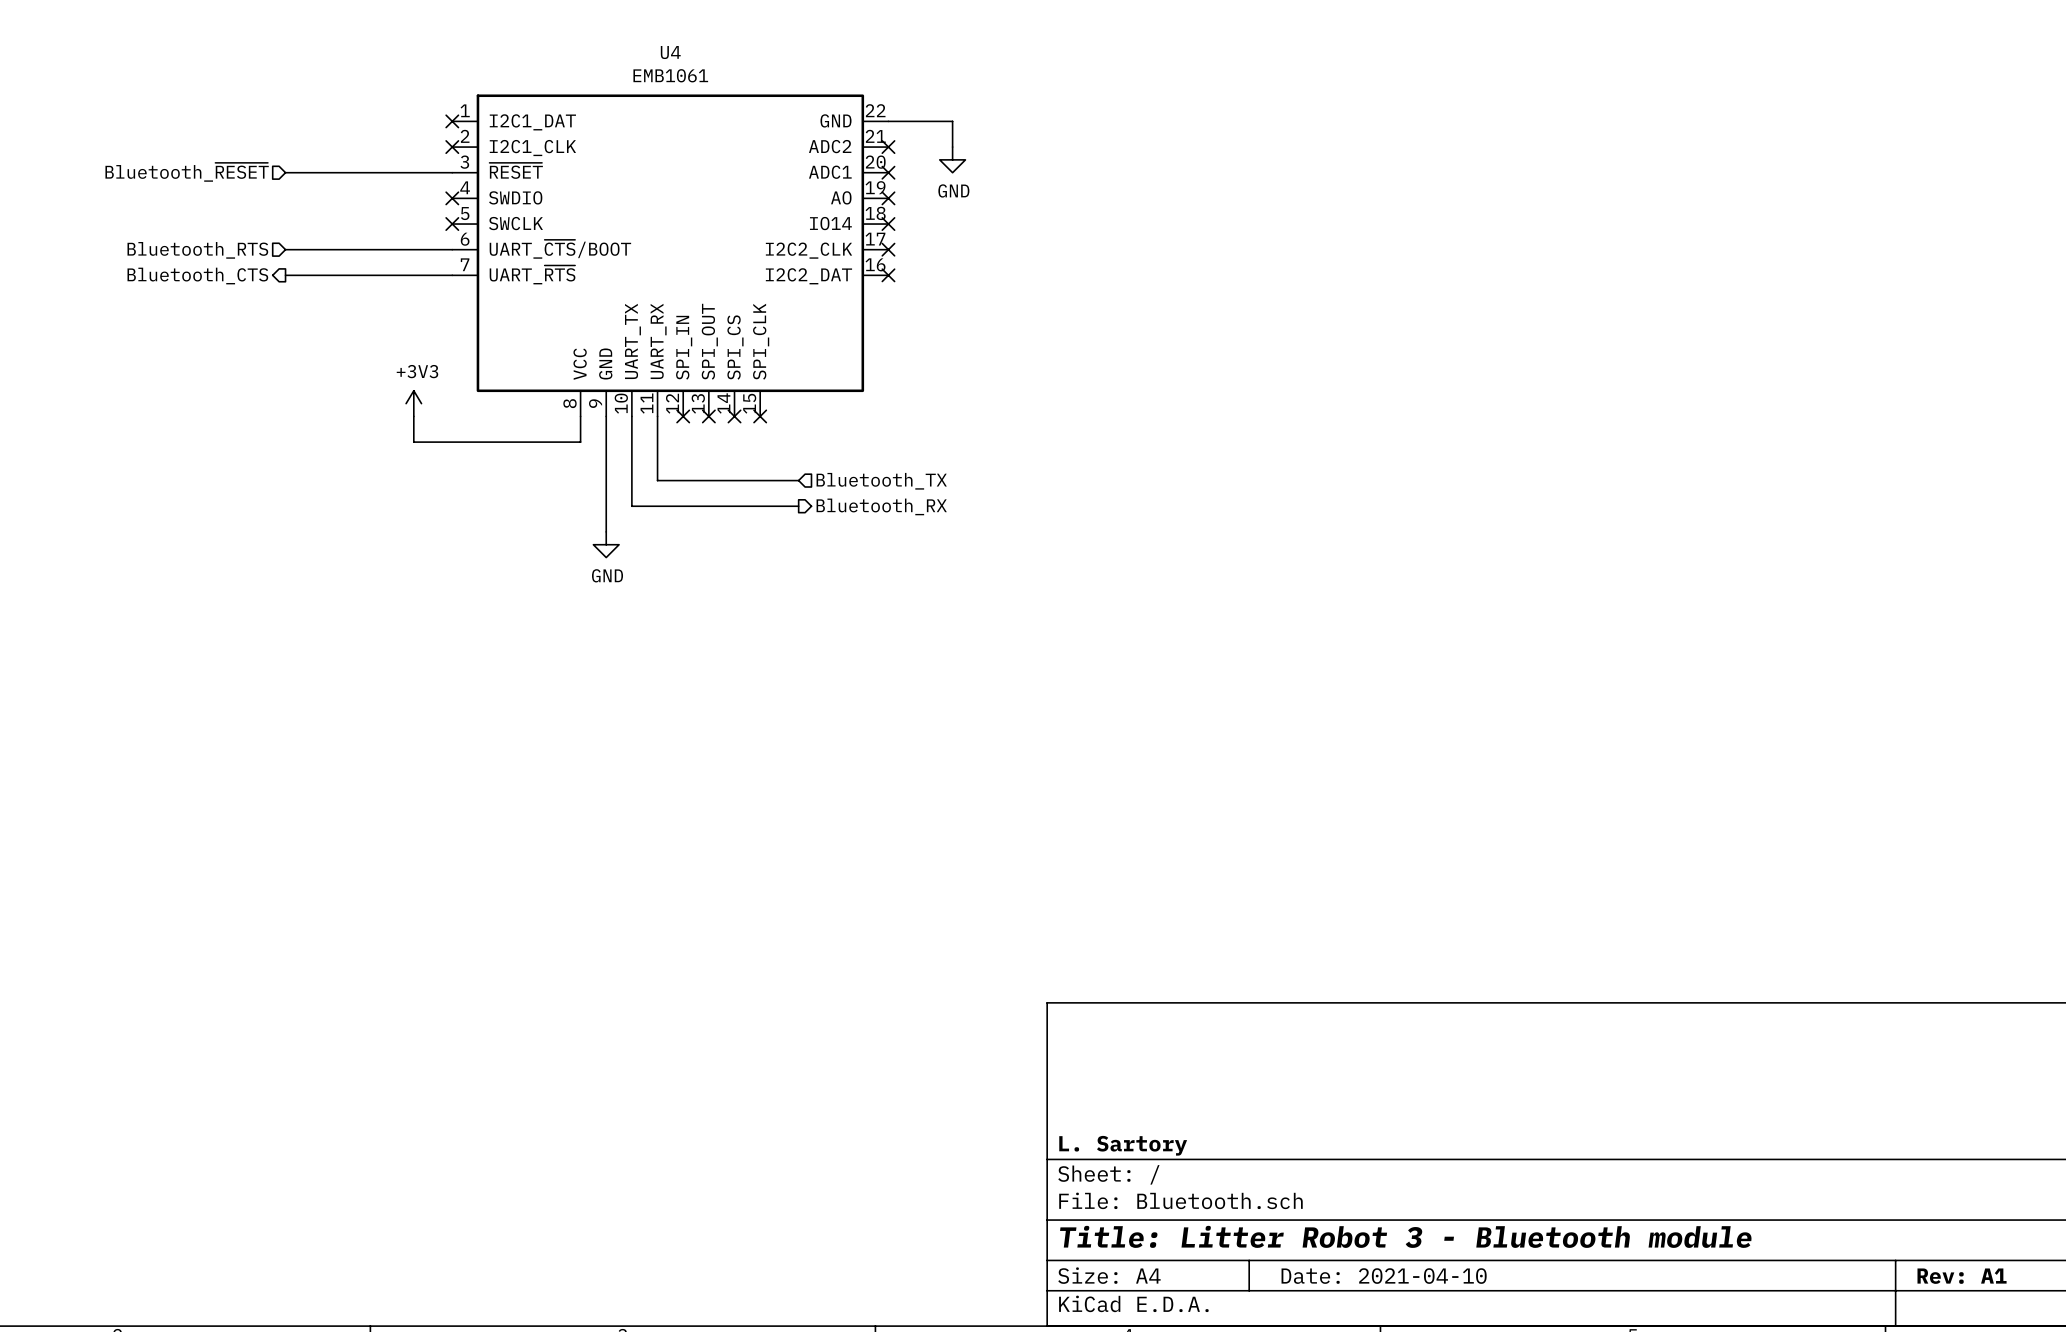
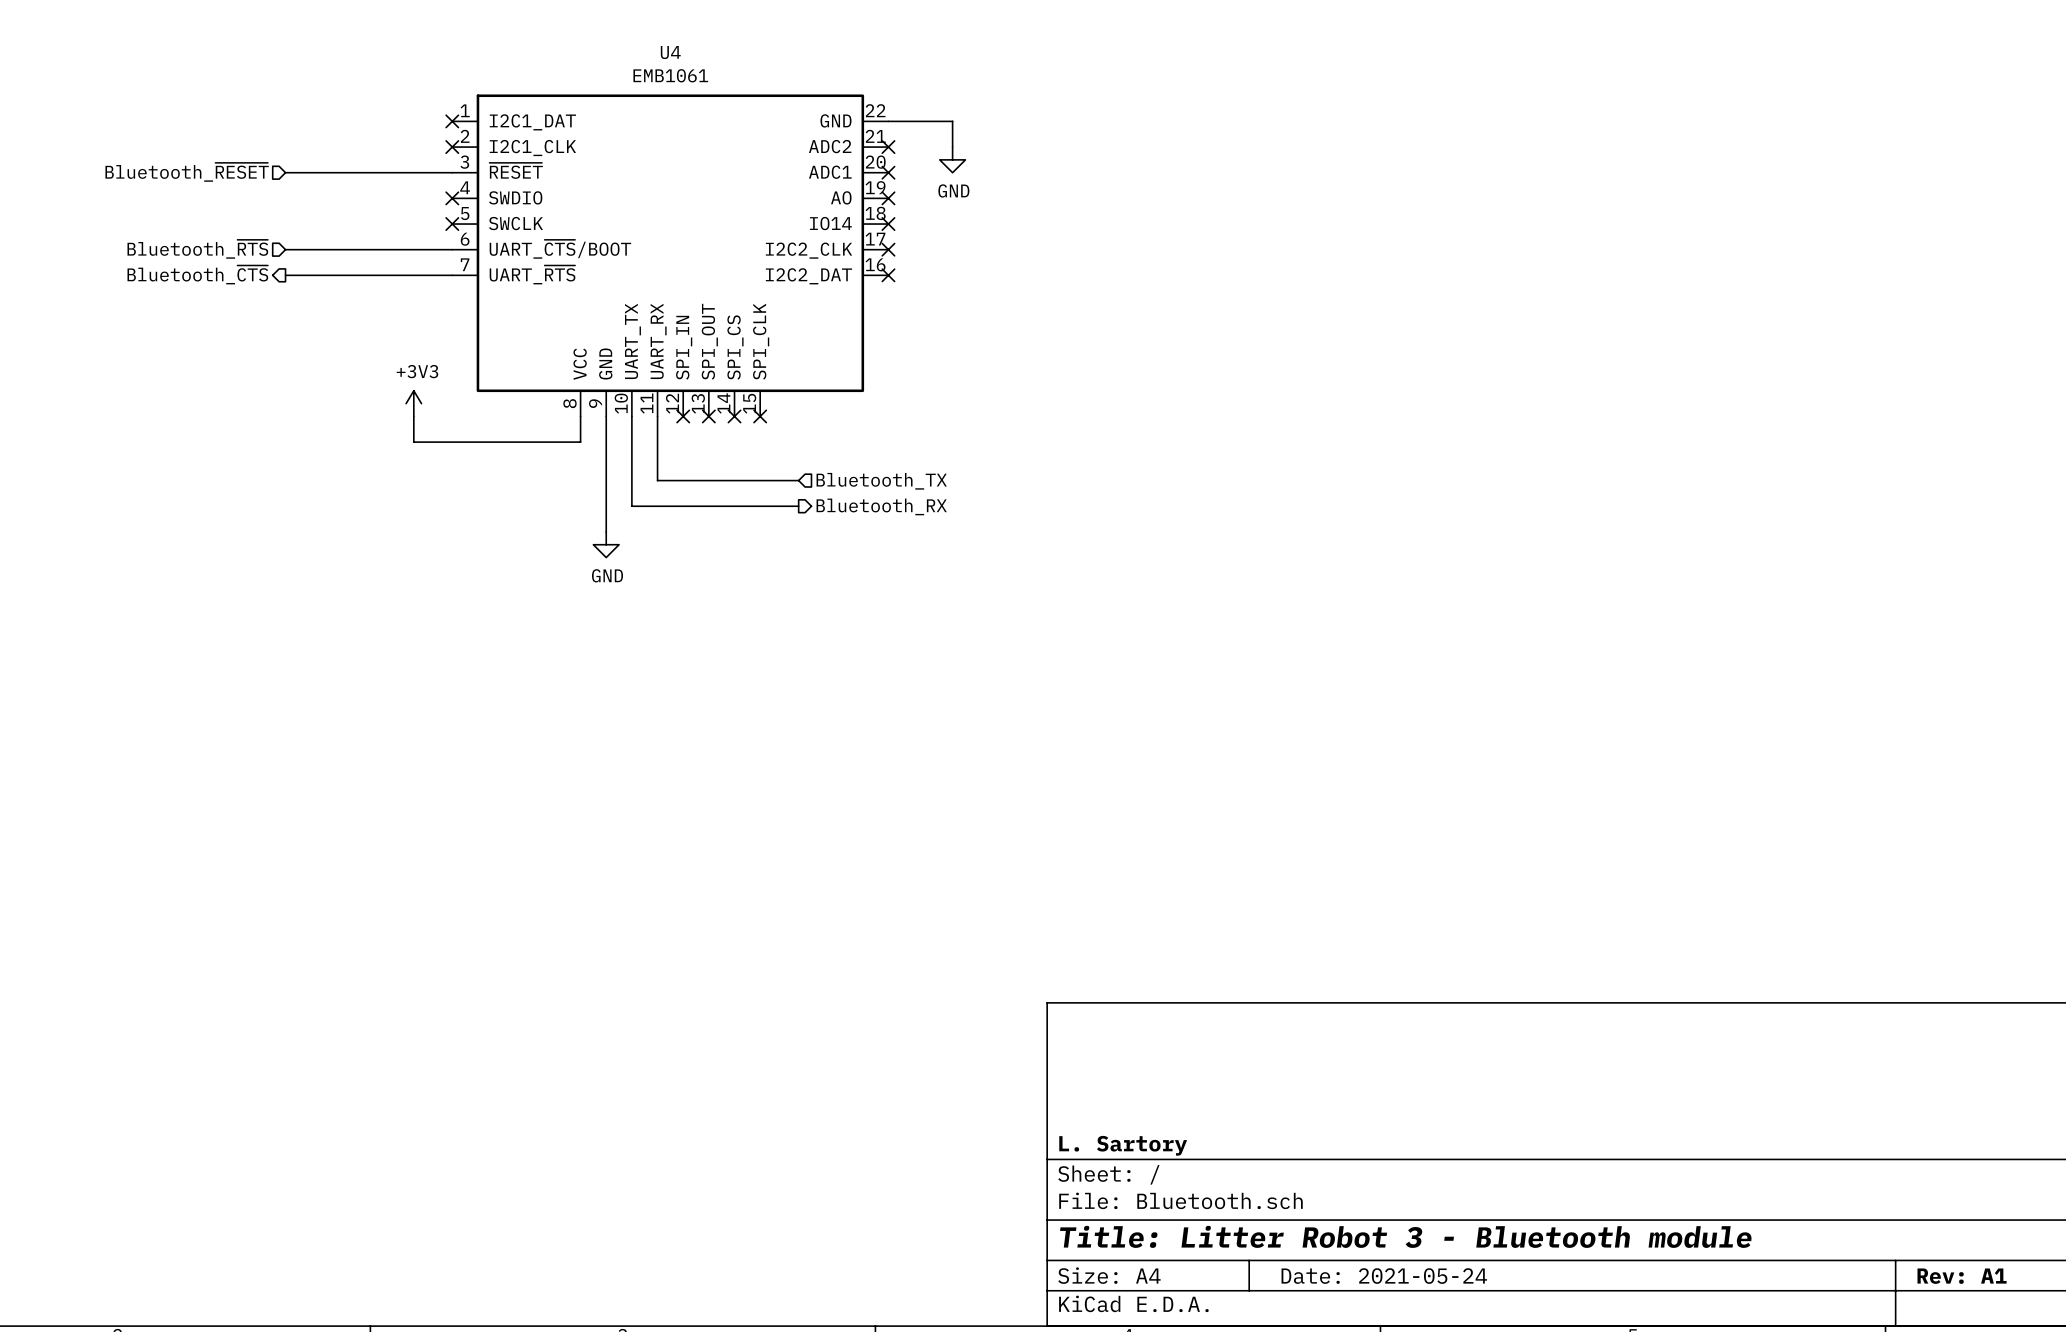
hierarchical label: Bluetooth_RTS (197, 250) -> Bluetooth_~{RTS} (197, 249)
hierarchical label: Bluetooth_CTS (197, 276) -> Bluetooth_~{CTS} (197, 274)
title block: Date: 2021-04-10 (1384, 1276) -> Date: 2021-05-24 (1384, 1276)

